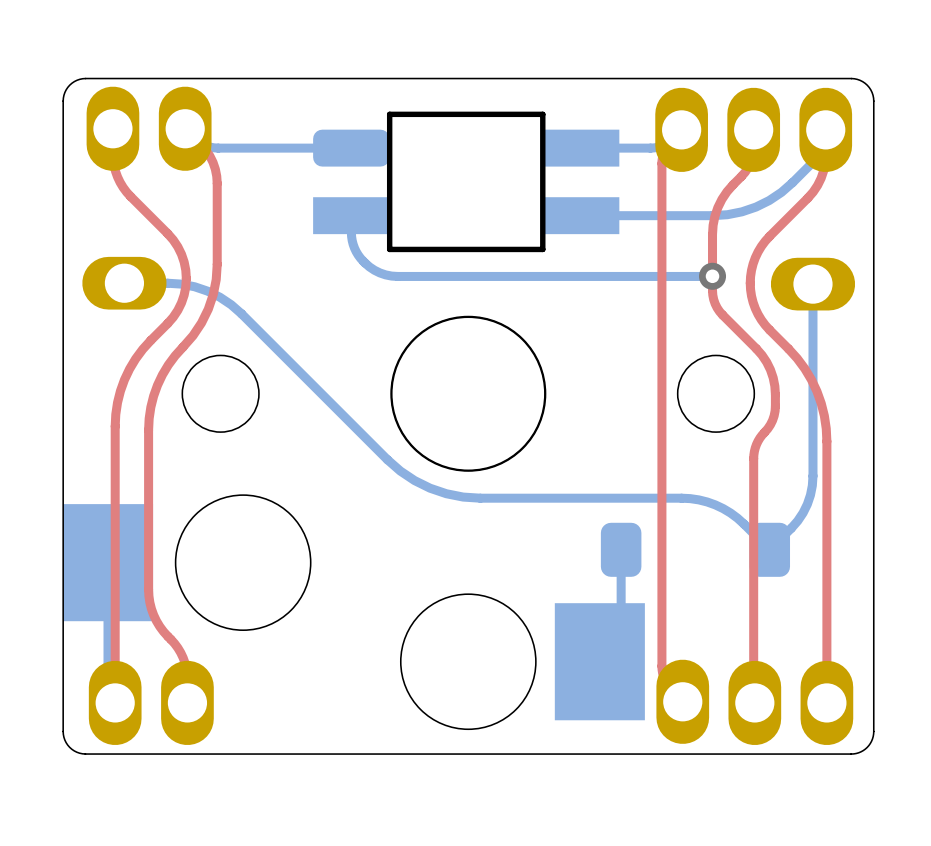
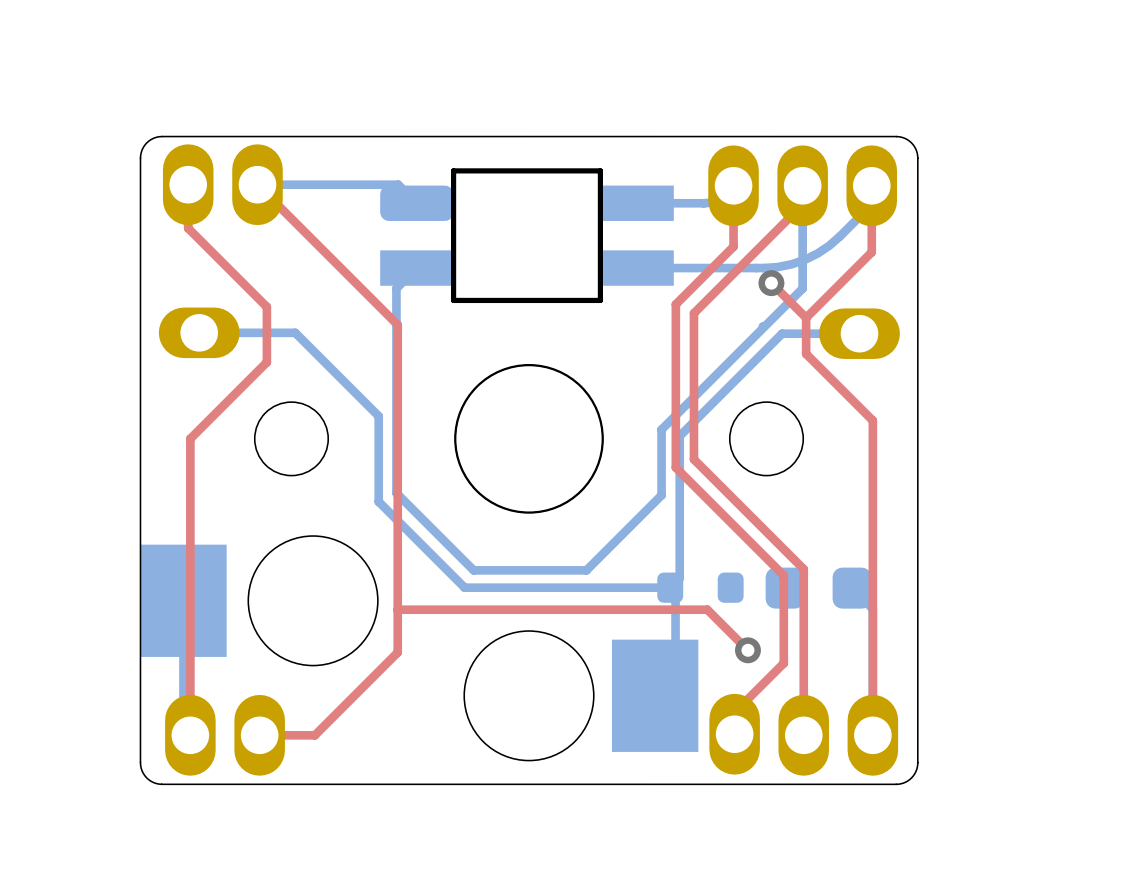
bottom track: (185, 128) (201, 143) (213, 147) (351, 148) -> (257, 184) (398, 184) (416, 203)
top track: (681, 129) (665, 147) (661, 163) (661, 666) (666, 682) (682, 701) -> (733, 185) (733, 246) (675, 304) (675, 467) (783, 575) (783, 663) (734, 712) (734, 734)
top track: (201, 144) (209, 156) (216, 176) (216, 279) (208, 309) (201, 322) (168, 364) (157, 385) (150, 407) (148, 430) (148, 596) (156, 620) (177, 648) (183, 657) (187, 673) (187, 702) -> (272, 200) (397, 324) (397, 652) (314, 735) (259, 735)
top track: (753, 147) (748, 167) (727, 191) (714, 216) (712, 234) (712, 290) (715, 303) (719, 311) (756, 348) (766, 362) (774, 386) (774, 415) (770, 424) (758, 441) (753, 455) (754, 702) (771, 685) -> (802, 202) (802, 204) (693, 313) (693, 459) (803, 569) (803, 735)
top track: (112, 153) (115, 171) (123, 187) (177, 246) (184, 262) (186, 278) (184, 295) (177, 310) (142, 349) (129, 369) (120, 391) (115, 426) -> (188, 208) (188, 228) (266, 306) (266, 362) (190, 438) (190, 470)
top track: (825, 155) (821, 178) (813, 192) (769, 236) (758, 251) (751, 270) (750, 283) (753, 302) (761, 319) (797, 358) (811, 379) (821, 403) (826, 441) -> (806, 317) (806, 353) (872, 420) (872, 484)
top track: none -> (871, 209) (871, 252) (806, 317)
bottom track: (351, 215) (352, 240) (358, 255) (374, 270) (391, 276) (712, 276) -> (416, 268) (396, 288) (396, 493) (473, 570) (586, 570) (661, 495) (661, 429) (802, 288) (802, 185)
top track: none -> (771, 283) (806, 317)
via position: (712, 276) -> (771, 283)
bottom track: (167, 283) (194, 286) (207, 291) (231, 304) (387, 459) (414, 480) (430, 488) (463, 497) (480, 498) (681, 498) (698, 499) (715, 504) (730, 513) (769, 549) (791, 528) (803, 512) (812, 485) (812, 283) -> (240, 332) (295, 332) (378, 416) (378, 501) (464, 587) (670, 587) (679, 578) (679, 436) (782, 333) (859, 333)
part: none -> (700, 587)
part: (695, 549) -> none
part: none -> (818, 588)
top track: none -> (397, 609) (707, 609) (747, 650)
via: none -> (747, 650)

